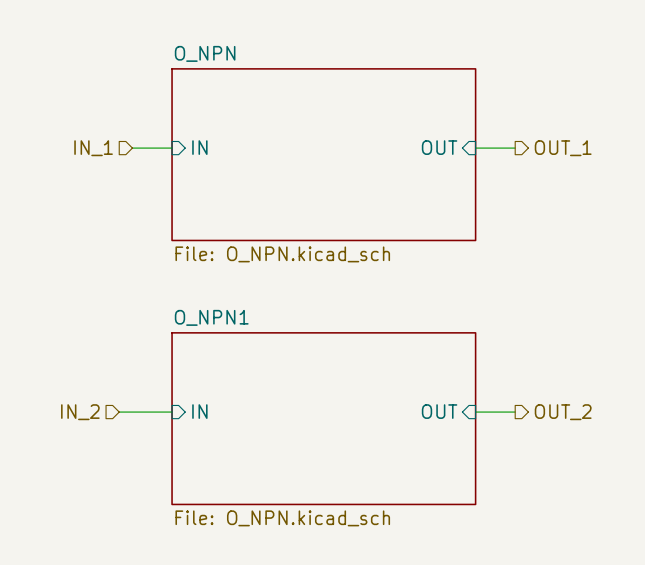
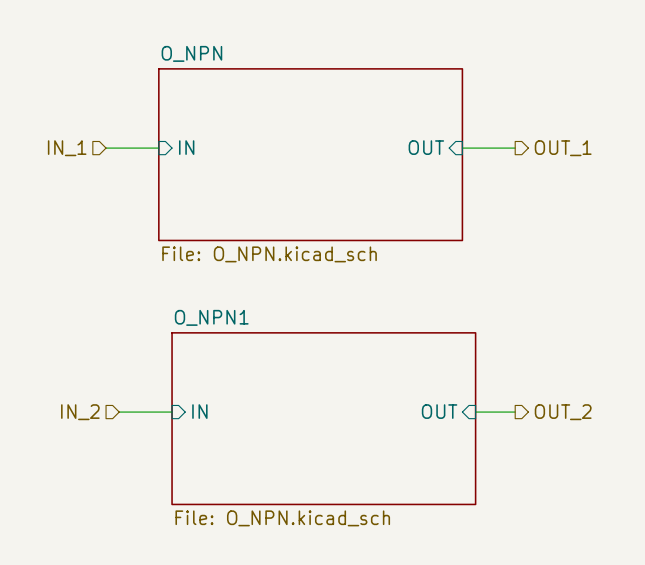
sheet pin position: IN (199, 147) -> IN (186, 147)
sheet pin position: OUT (439, 147) -> OUT (426, 147)
hierarchical label position: IN_1 (93, 148) -> IN_1 (67, 148)
wire: none -> (106, 148) (132, 148)
wire: (158, 148) (172, 148) -> none
wire: none -> (462, 148) (475, 148)
sheet O_NPN position: (323, 154) -> (310, 154)

